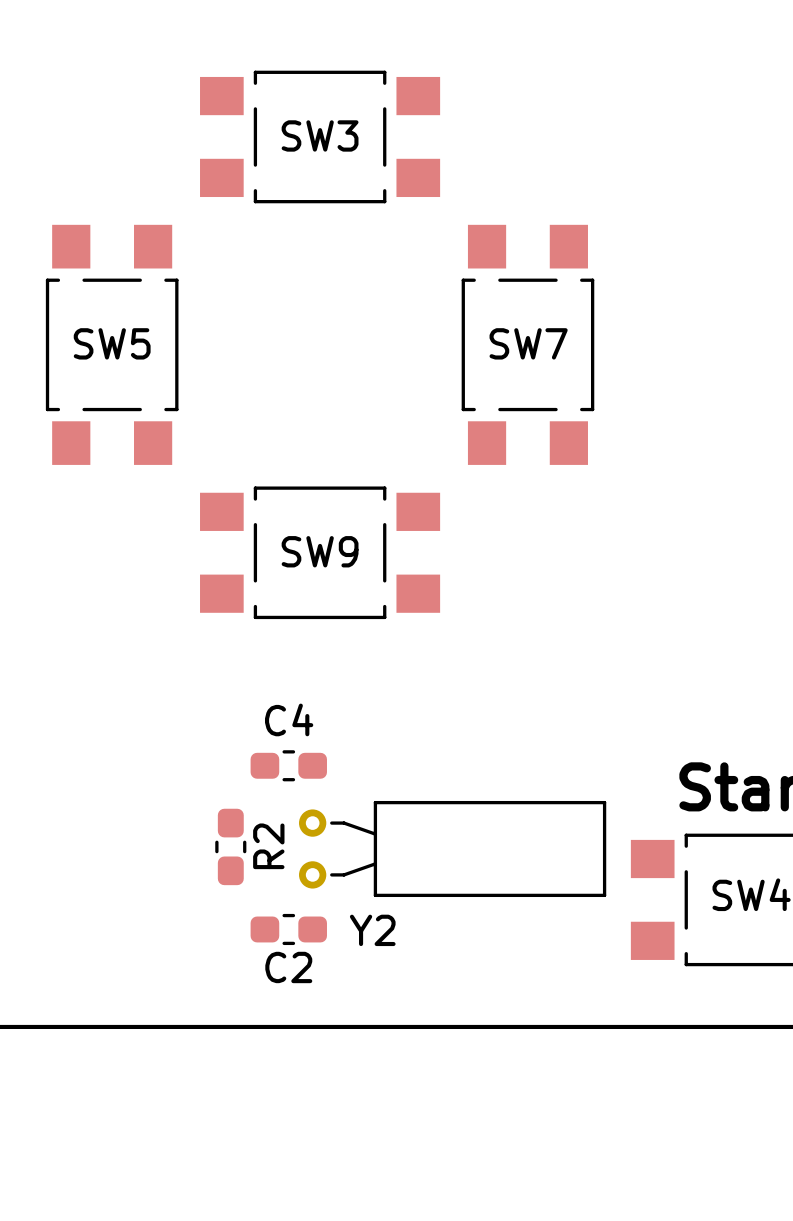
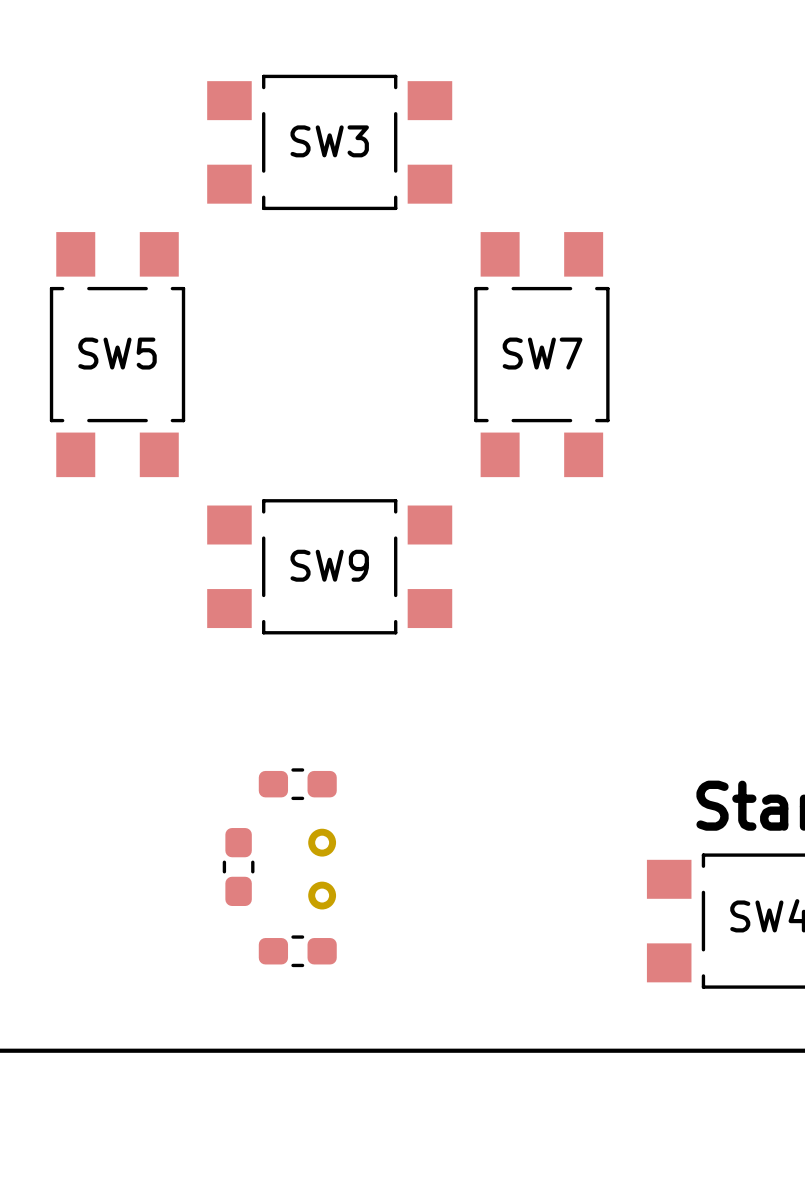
C4 name: C4 (289, 719) -> none
R2 name: R2 (268, 846) -> none
Y2: (452, 848) -> none
C2 name: C2 (288, 967) -> none

